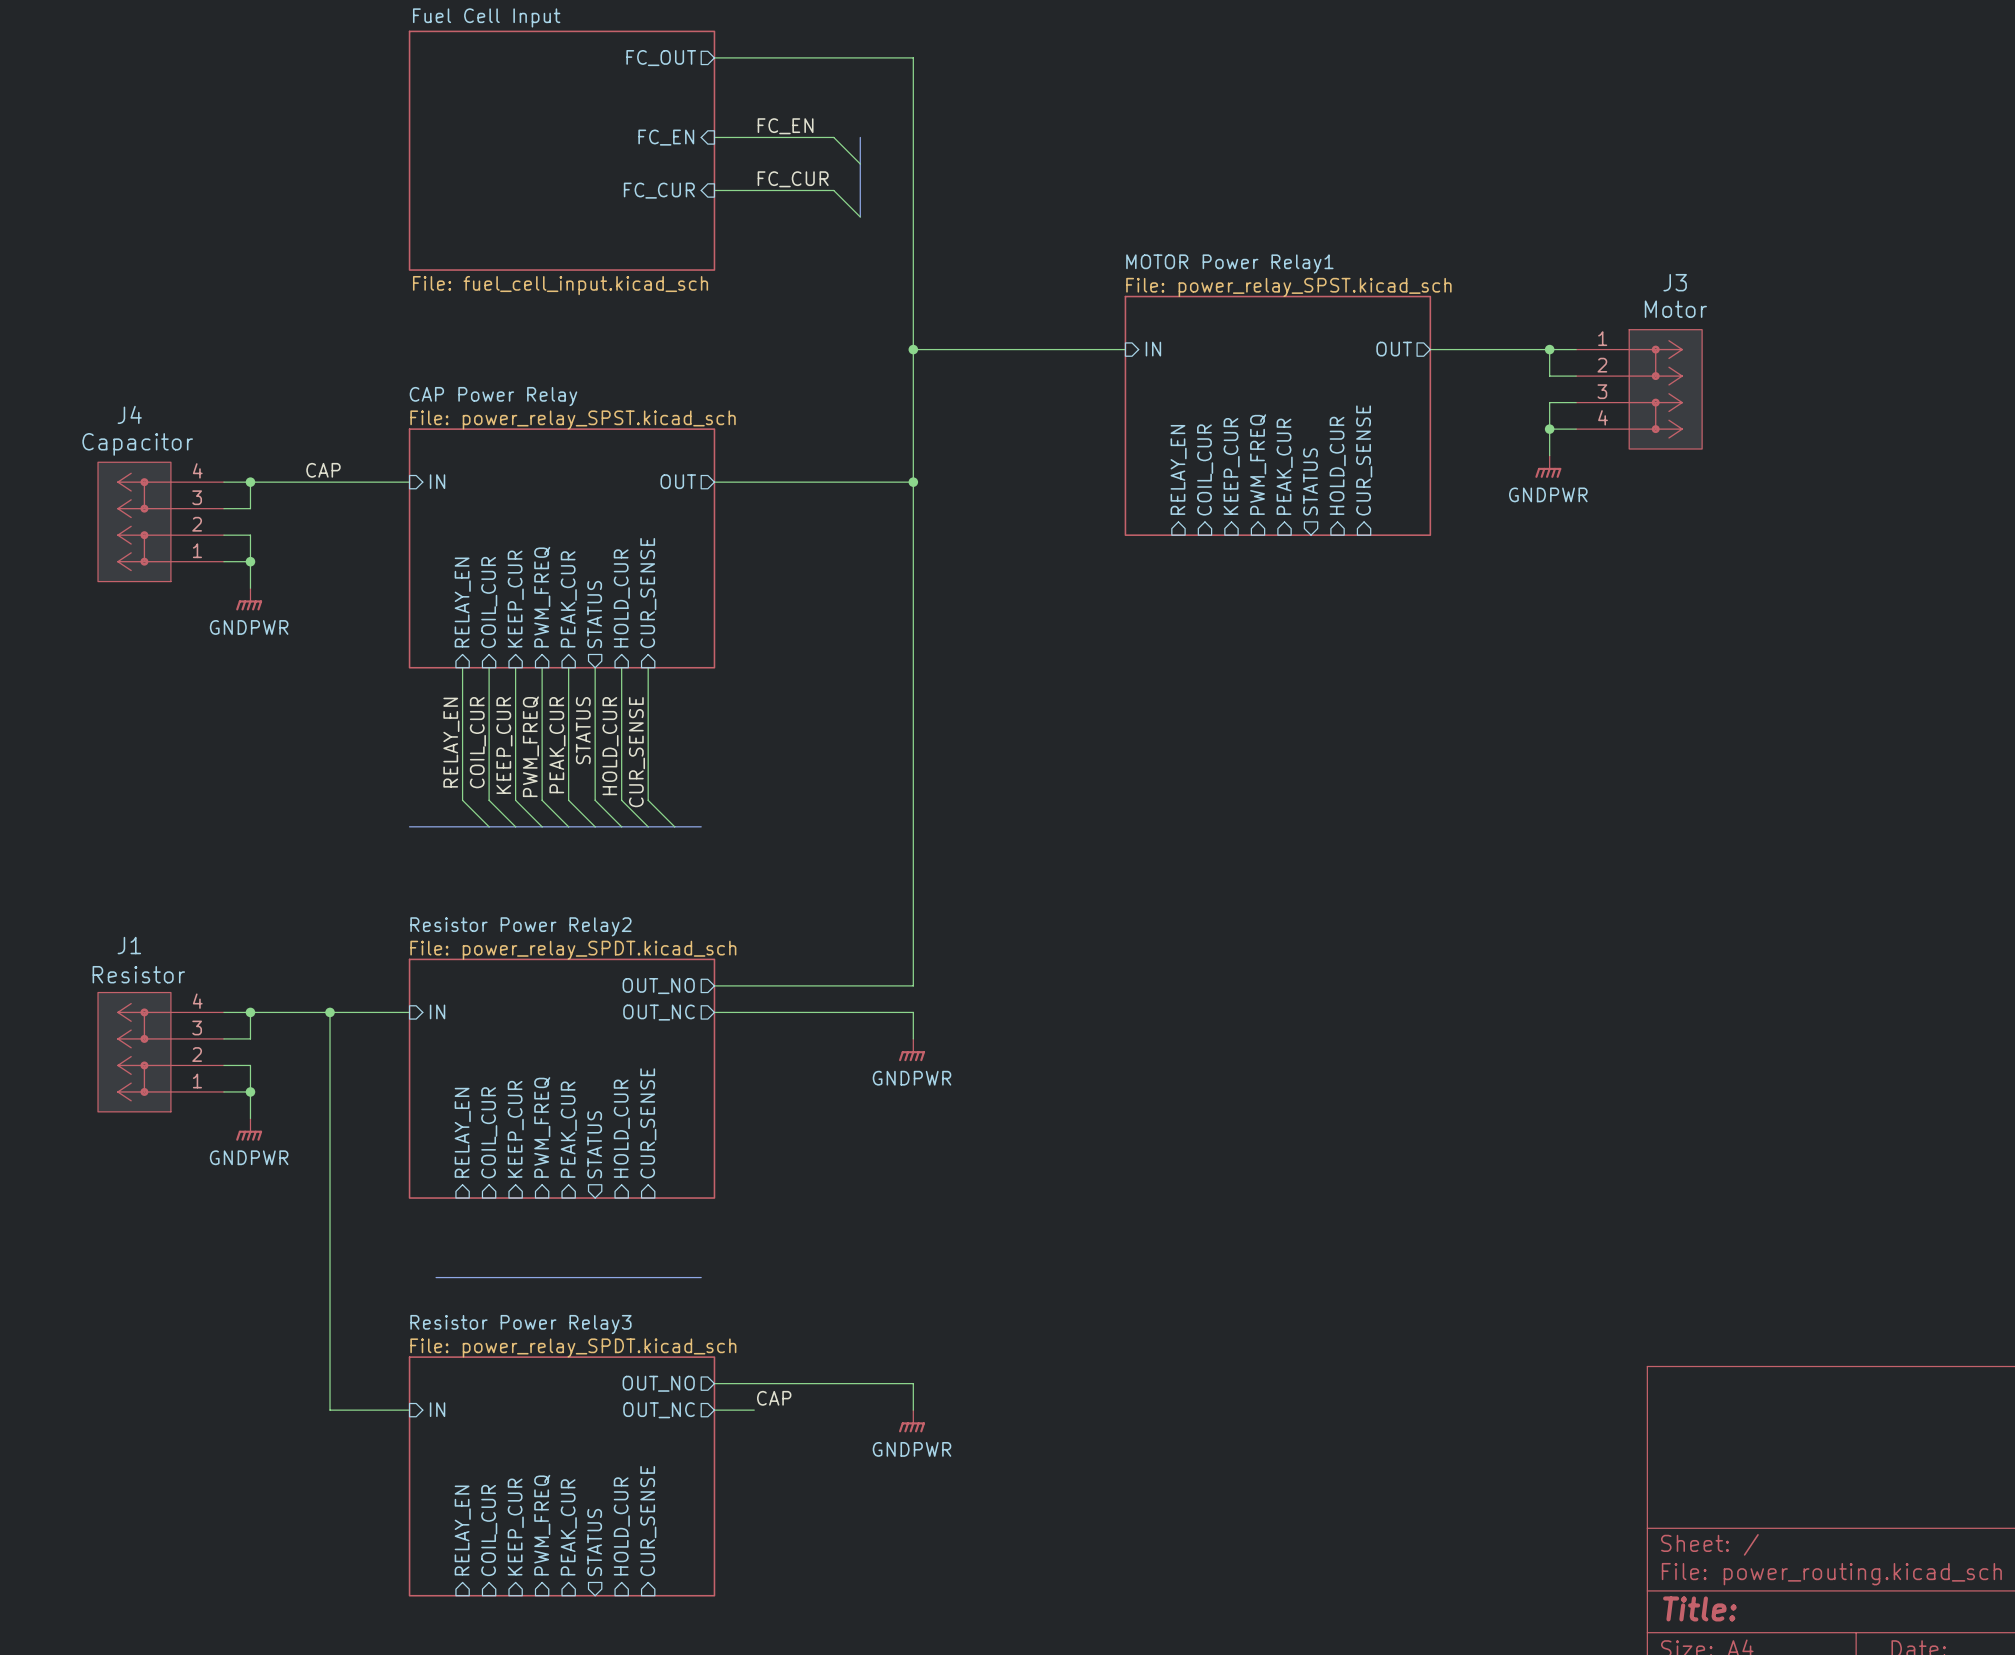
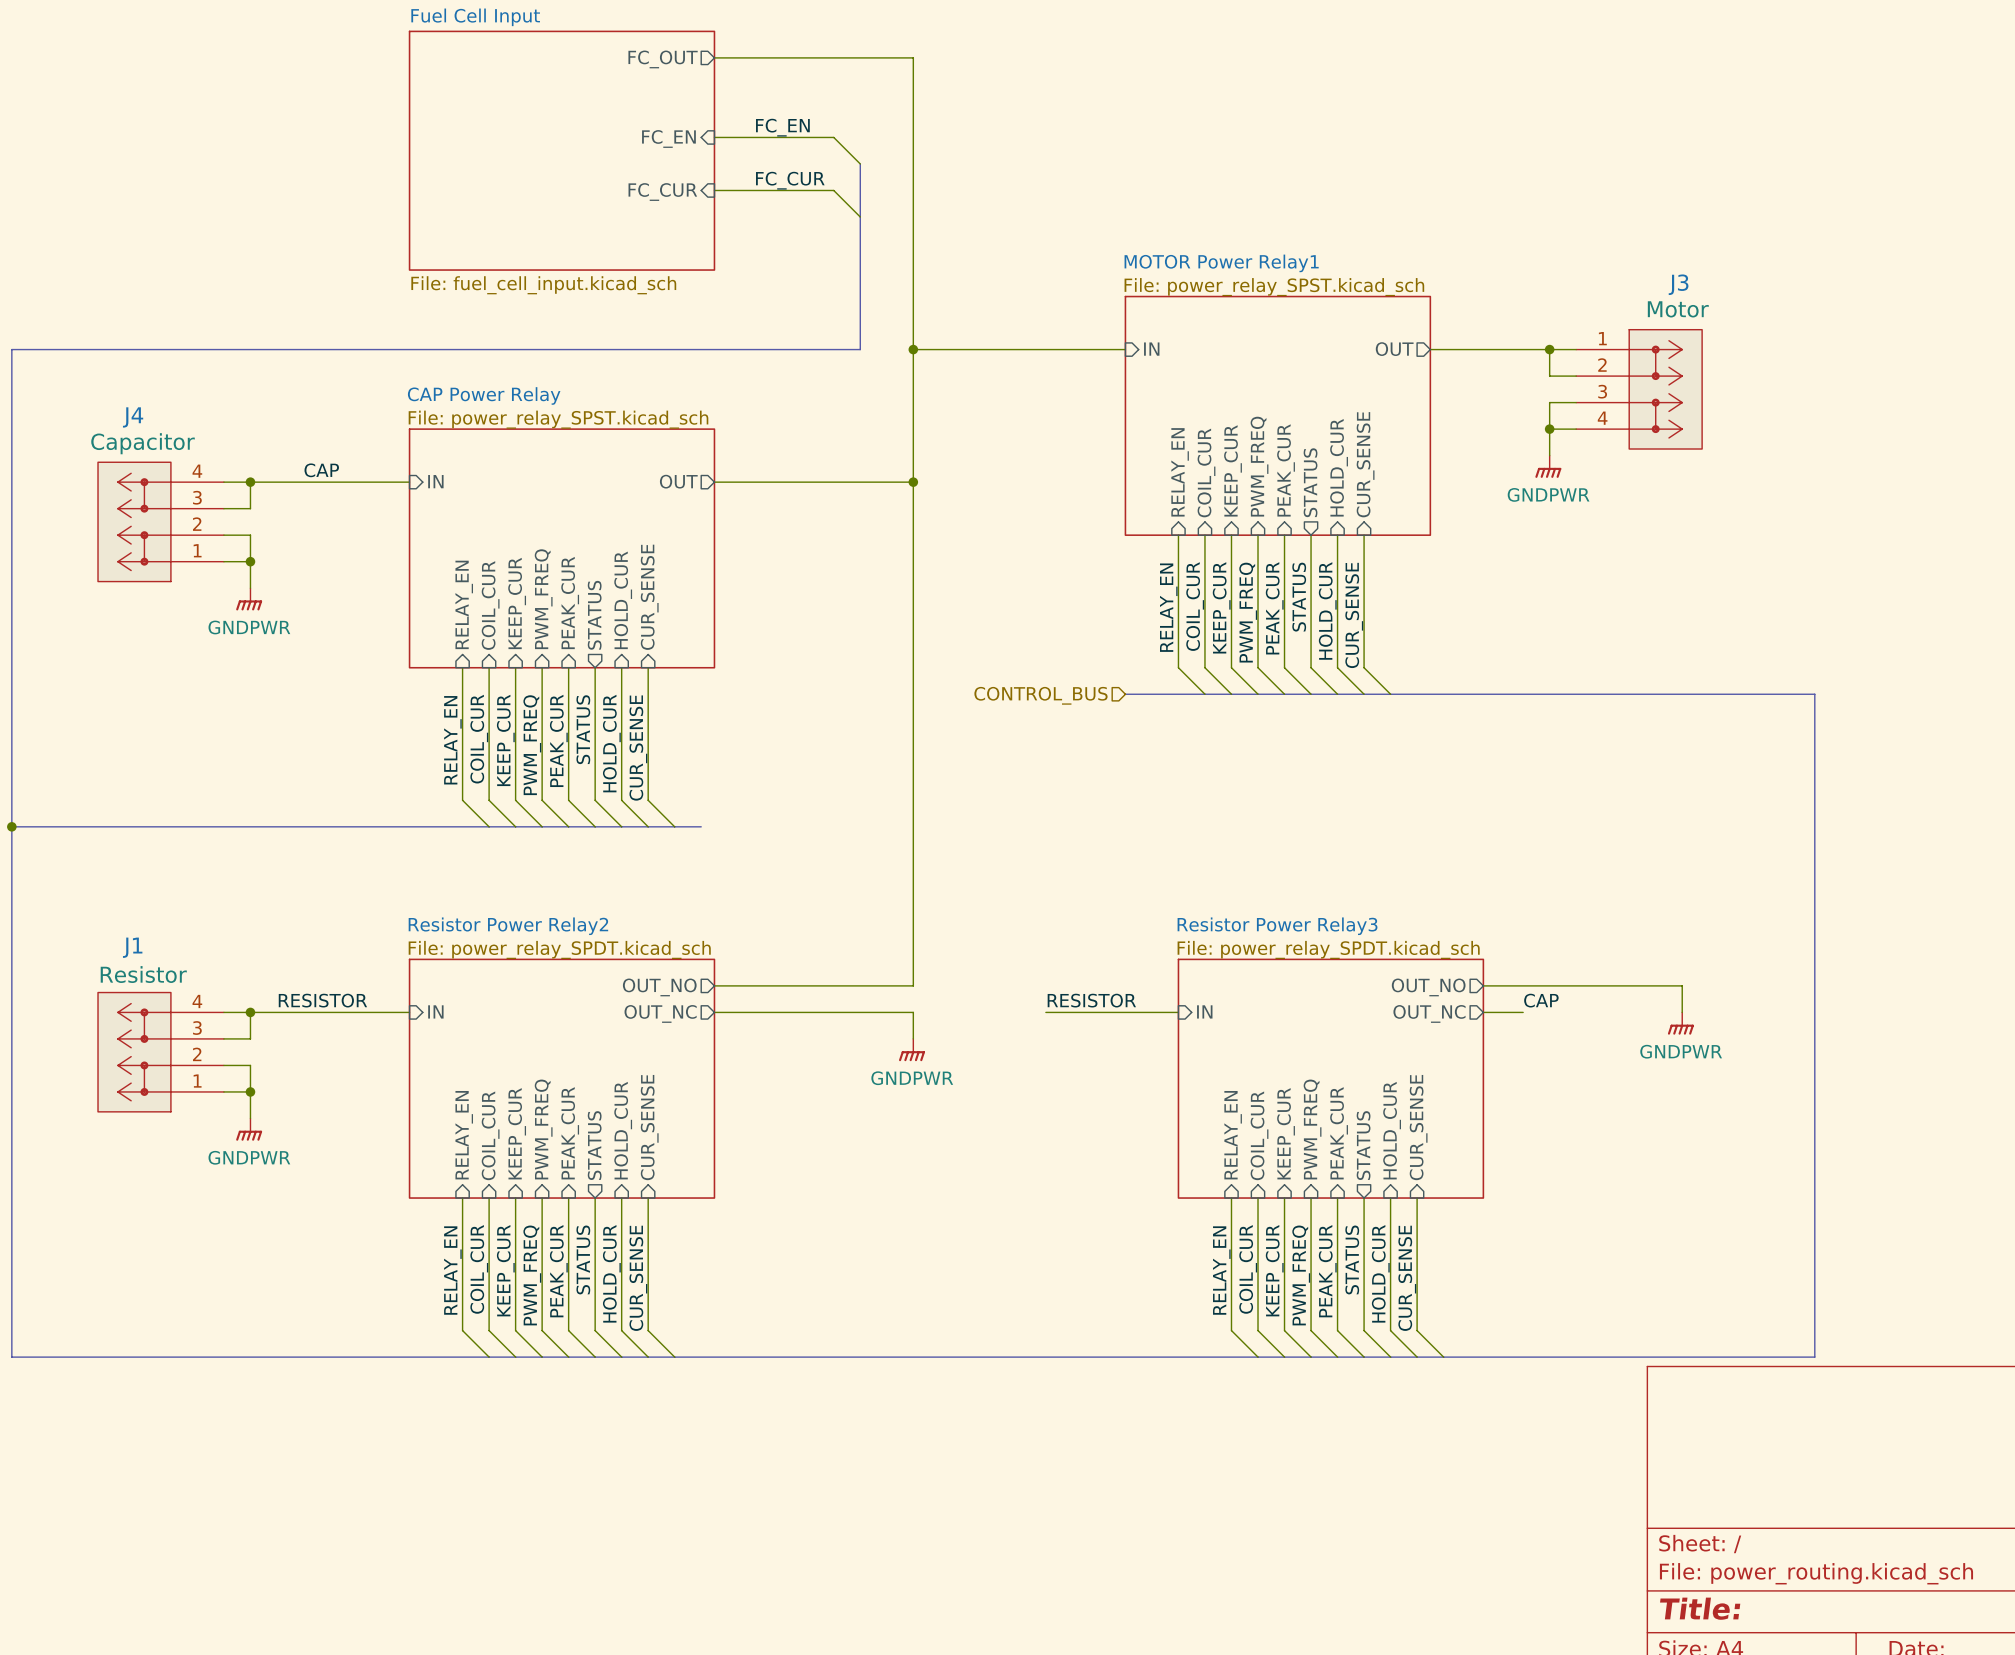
bus: (860, 137) (860, 163) -> none
bus: none -> (860, 217) (860, 349) (11, 349) (11, 1357) (1814, 1357) (1814, 694) (1125, 694)
wire: none -> (1178, 535) (1178, 667) (1204, 694)
wire: none -> (1204, 535) (1204, 667) (1231, 694)
wire: none -> (1231, 535) (1231, 667) (1258, 694)
wire: none -> (1258, 535) (1258, 667) (1284, 694)
wire: none -> (1284, 535) (1284, 667) (1311, 694)
wire: none -> (1311, 535) (1311, 667) (1337, 694)
wire: none -> (1337, 535) (1337, 667) (1364, 694)
wire: none -> (1364, 535) (1364, 667) (1390, 694)
label: none -> STATUS (1299, 597)
label: none -> RELAY_EN (1168, 607)
label: none -> COIL_CUR (1195, 606)
label: none -> KEEP_CUR (1221, 607)
label: none -> PEAK_CUR (1274, 608)
label: none -> HOLD_CUR (1327, 610)
label: none -> PWM_FREQ (1248, 612)
label: none -> CUR_SENSE (1354, 615)
hierarchical label: none -> CONTROL_BUS (1040, 695)
bus: none -> (11, 826) (409, 826)
junction: none -> (11, 826)
wire: none -> (1483, 985) (1682, 985) (1682, 1012)
sheet pin: none -> OUT_NO (1428, 987)
label: none -> RESISTOR (322, 1000)
label: none -> RESISTOR (1091, 1000)
label: none -> CAP (1541, 1000)
sheet pin: none -> IN (1204, 1011)
wire: (330, 1012) (330, 1410) (409, 1410) -> none
junction: (330, 1012) -> none
wire: none -> (1045, 1012) (1178, 1012)
sheet pin: none -> OUT_NC (1429, 1013)
wire: none -> (1483, 1012) (1523, 1012)
power symbol: none -> GNDPWR (1680, 1023)
sheet pin: none -> CUR_SENSE (1418, 1127)
sheet pin: none -> PWM_FREQ (1312, 1129)
sheet pin: none -> HOLD_CUR (1392, 1130)
sheet pin: none -> KEEP_CUR (1286, 1133)
sheet pin: none -> PEAK_CUR (1339, 1133)
sheet pin: none -> RELAY_EN (1233, 1135)
sheet pin: none -> COIL_CUR (1259, 1135)
sheet pin: none -> STATUS (1363, 1145)
wire: none -> (462, 1198) (462, 1330) (489, 1357)
wire: none -> (489, 1198) (489, 1330) (515, 1357)
wire: none -> (515, 1198) (515, 1330) (542, 1357)
wire: none -> (542, 1198) (542, 1330) (568, 1357)
wire: none -> (568, 1198) (568, 1330) (595, 1357)
wire: none -> (595, 1198) (595, 1330) (621, 1357)
wire: none -> (621, 1198) (621, 1330) (648, 1357)
wire: none -> (648, 1198) (648, 1330) (674, 1357)
wire: none -> (1231, 1198) (1231, 1330) (1258, 1357)
wire: none -> (1258, 1198) (1258, 1330) (1284, 1357)
wire: none -> (1284, 1198) (1284, 1330) (1311, 1357)
wire: none -> (1311, 1198) (1311, 1330) (1337, 1357)
wire: none -> (1337, 1198) (1337, 1330) (1364, 1357)
wire: none -> (1364, 1198) (1364, 1330) (1390, 1357)
wire: none -> (1390, 1198) (1390, 1330) (1417, 1357)
wire: none -> (1417, 1198) (1417, 1330) (1443, 1357)
label: none -> STATUS (583, 1259)
label: none -> STATUS (1352, 1259)
label: none -> RELAY_EN (452, 1270)
label: none -> COIL_CUR (479, 1269)
label: none -> RELAY_EN (1221, 1270)
label: none -> COIL_CUR (1248, 1269)
label: none -> KEEP_CUR (505, 1270)
label: none -> PEAK_CUR (558, 1271)
label: none -> KEEP_CUR (1274, 1270)
label: none -> PEAK_CUR (1327, 1271)
label: none -> HOLD_CUR (611, 1273)
label: none -> HOLD_CUR (1380, 1273)
bus: (436, 1277) (701, 1277) -> none
label: none -> PWM_FREQ (532, 1275)
label: none -> PWM_FREQ (1301, 1275)
label: none -> CUR_SENSE (638, 1278)
label: none -> CUR_SENSE (1407, 1278)
sheet pin: OUT_NO (658, 1383) -> none
wire: (714, 1383) (913, 1383) (913, 1410) -> none
label: CAP (774, 1398) -> none
sheet pin: IN (437, 1409) -> none
sheet pin: OUT_NC (659, 1410) -> none
wire: (714, 1410) (754, 1410) -> none
power symbol: GNDPWR (911, 1421) -> none
sheet Resistor Power Relay3 position: (562, 1476) -> (1330, 1078)
sheet pin: CUR_SENSE (648, 1521) -> none
sheet pin: PWM_FREQ (542, 1525) -> none
sheet pin: HOLD_CUR (621, 1526) -> none
sheet pin: KEEP_CUR (515, 1527) -> none
sheet pin: PEAK_CUR (568, 1527) -> none
sheet pin: RELAY_EN (462, 1530) -> none
sheet pin: COIL_CUR (489, 1530) -> none
sheet pin: STATUS (594, 1542) -> none

